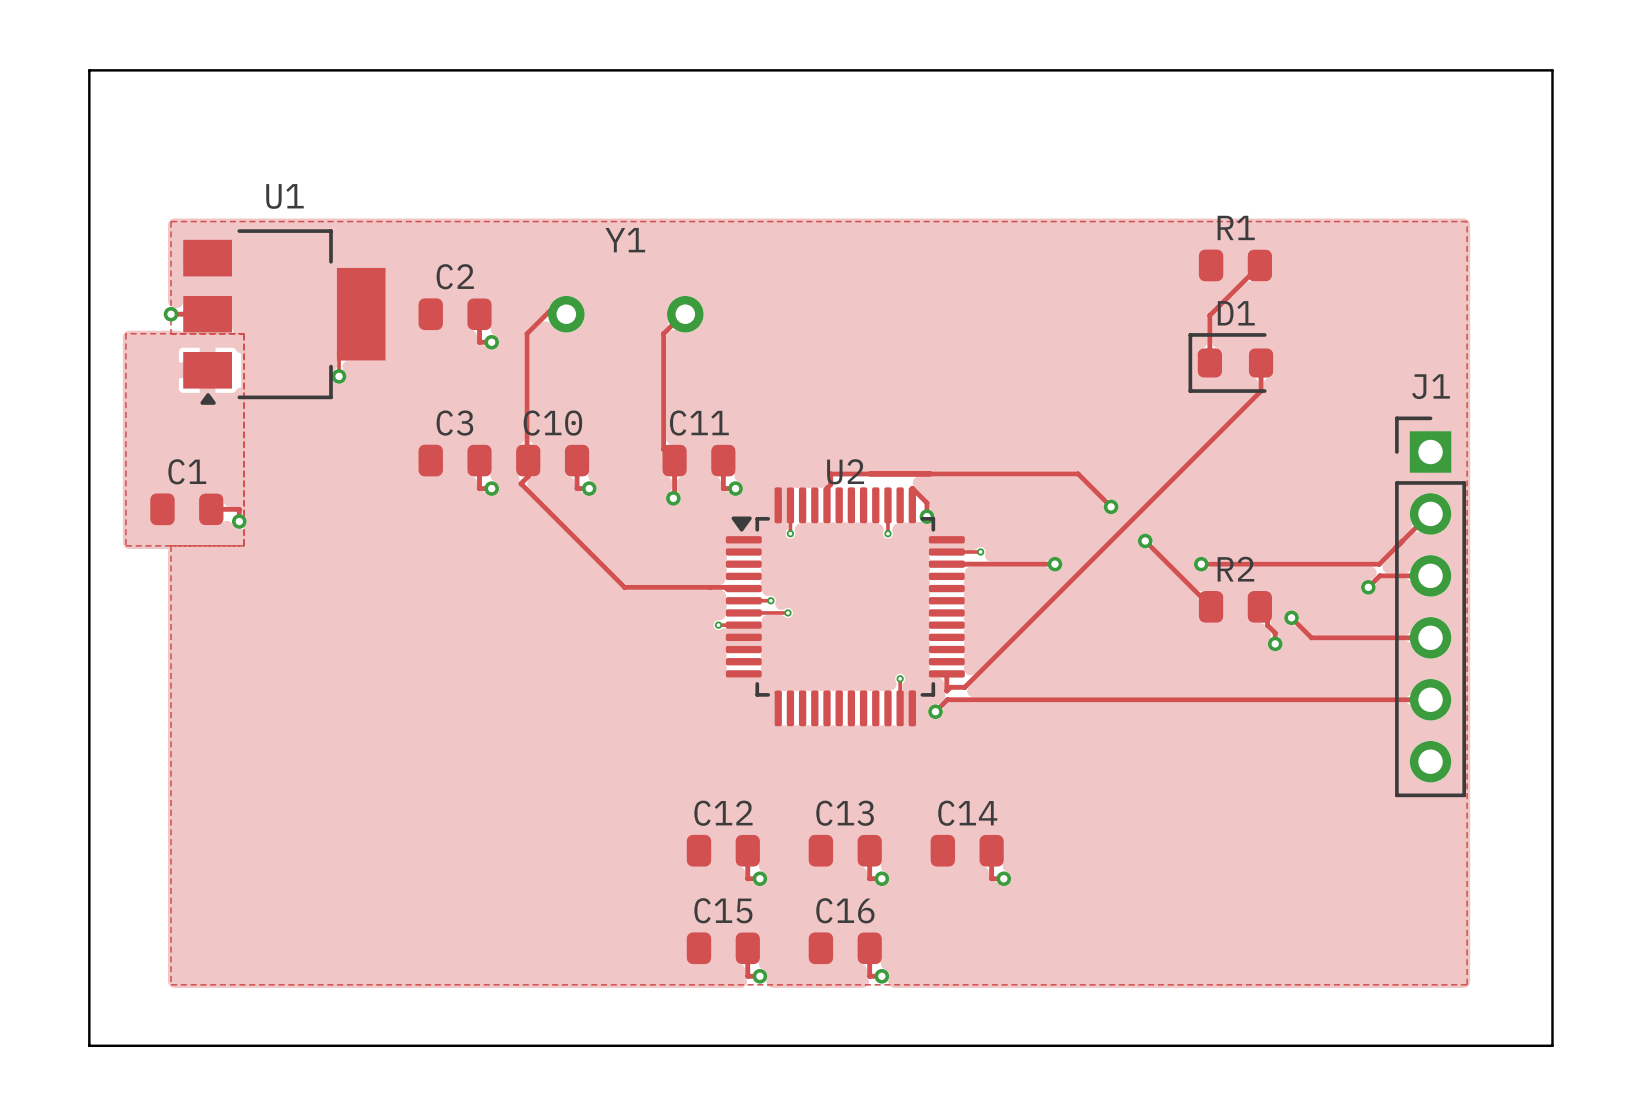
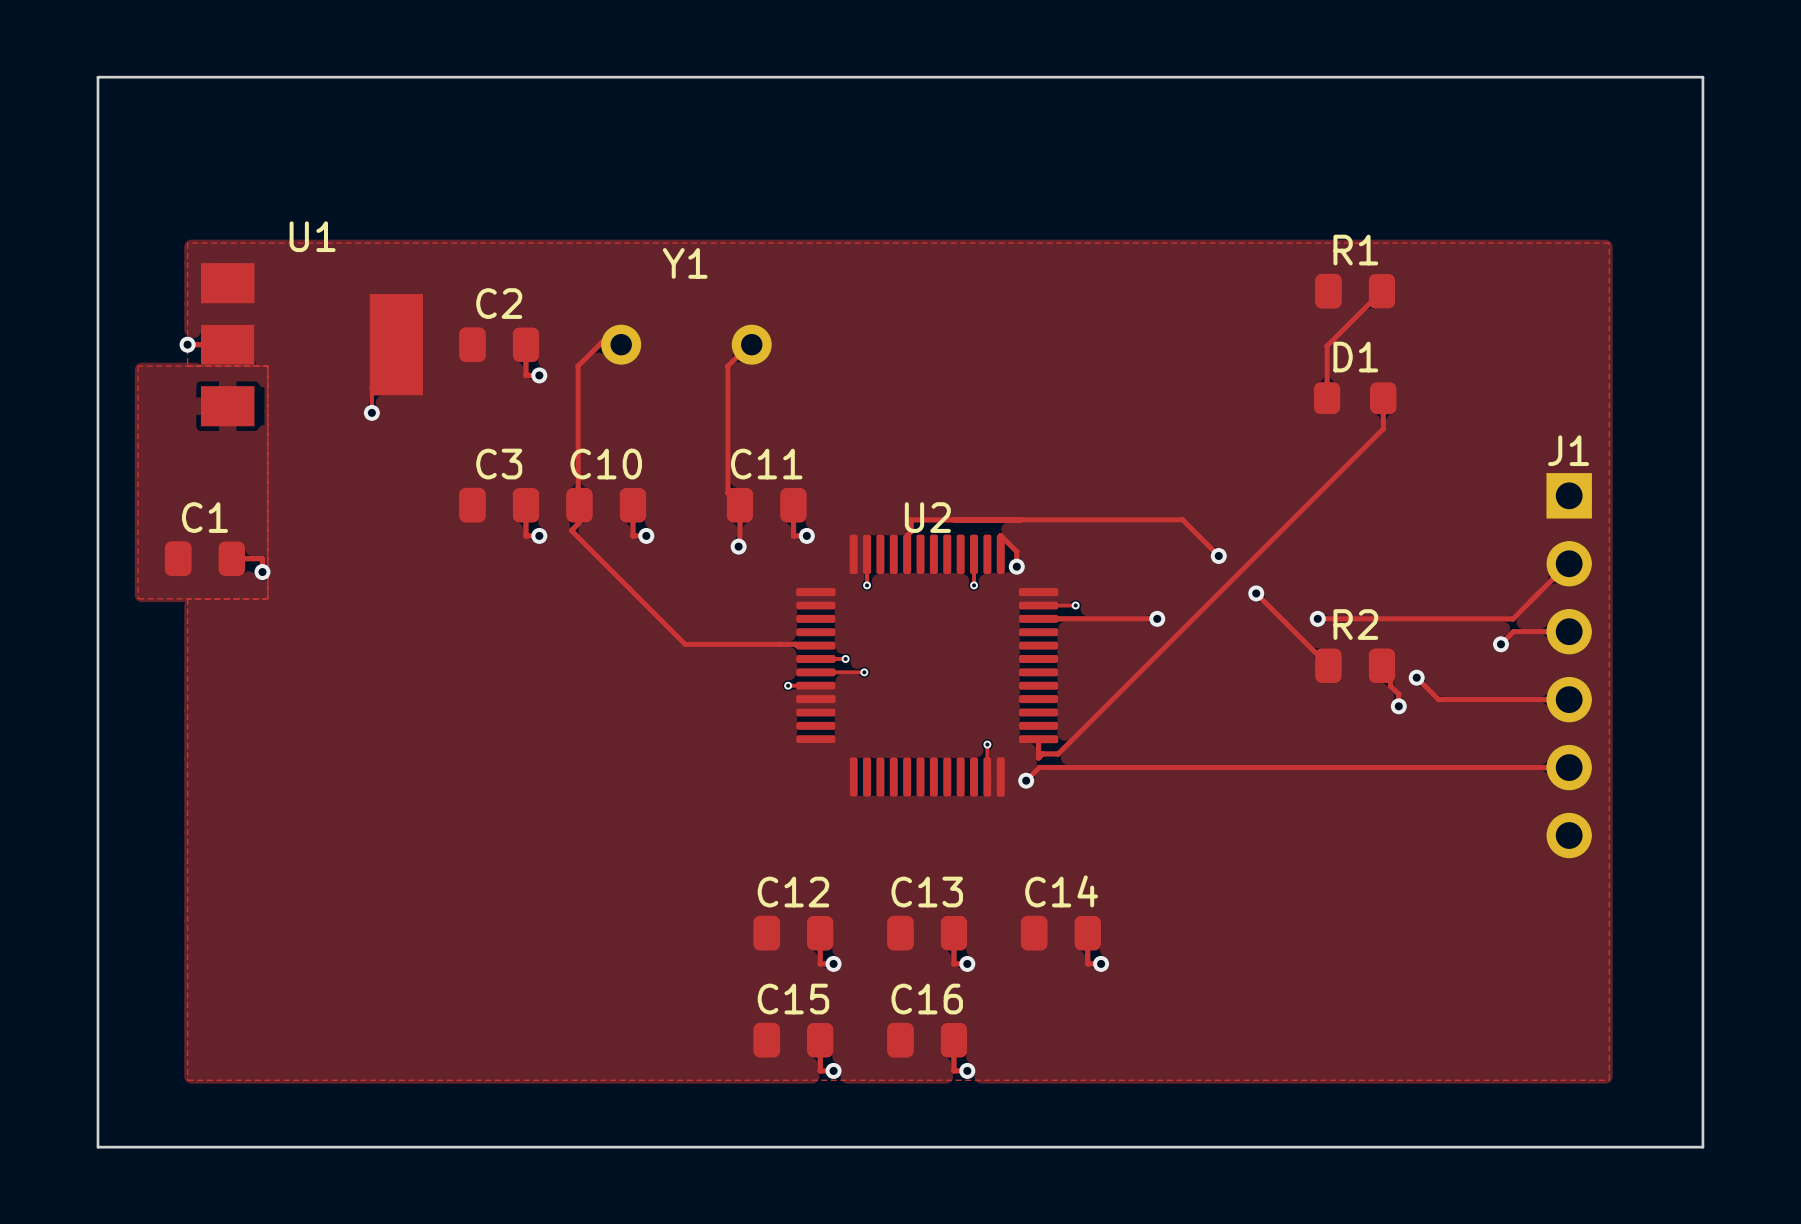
U1 footprint: [183, 229, 386, 405] -> [200, 263, 423, 427]
D1 footprint: [1188, 333, 1274, 393] -> [1313, 382, 1397, 415]
J1 footprint: [1395, 416, 1467, 798] -> [1546, 473, 1592, 859]
U2 footprint: [725, 487, 965, 727] -> [796, 534, 1059, 797]

